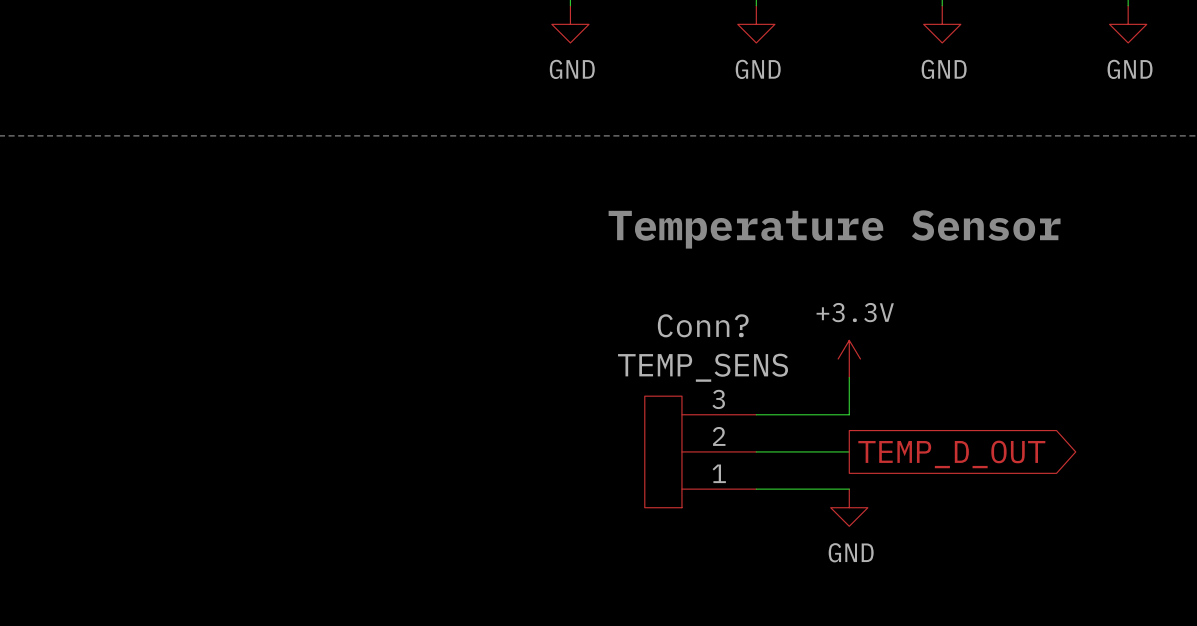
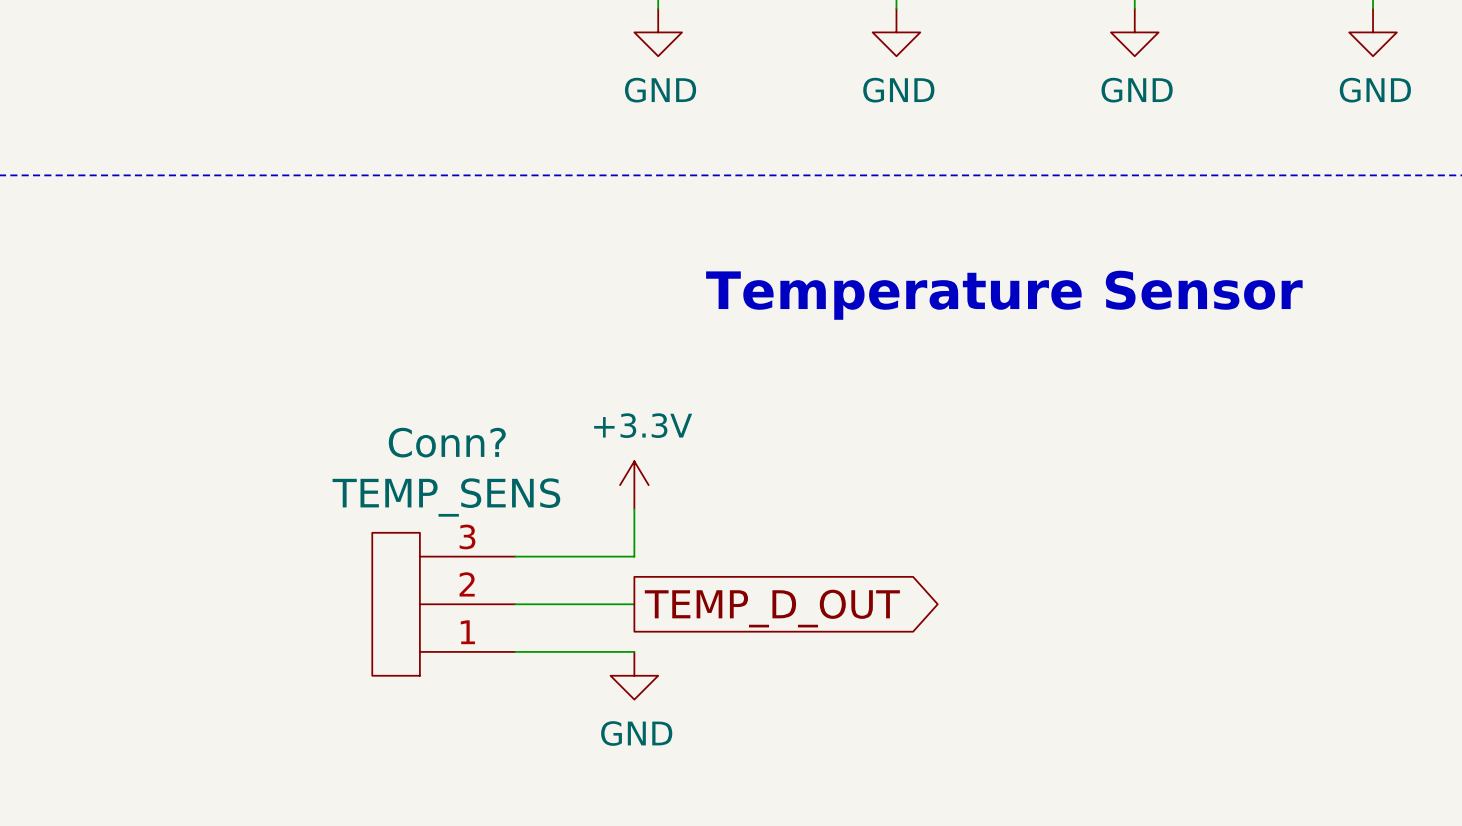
power symbol position: +3.3V (849, 358) -> +3.3V (634, 485)
wire: (849, 377) (849, 414) (756, 414) -> (634, 508) (634, 556) (515, 556)
Conn? position: (700, 451) -> (443, 604)
wire: (756, 451) (849, 451) -> (515, 651) (634, 651)
global label position: TEMP_D_OUT (951, 454) -> TEMP_D_OUT (772, 608)
wire: (756, 489) (849, 489) -> (515, 604) (634, 604)
power symbol position: GND (849, 507) -> GND (634, 675)

